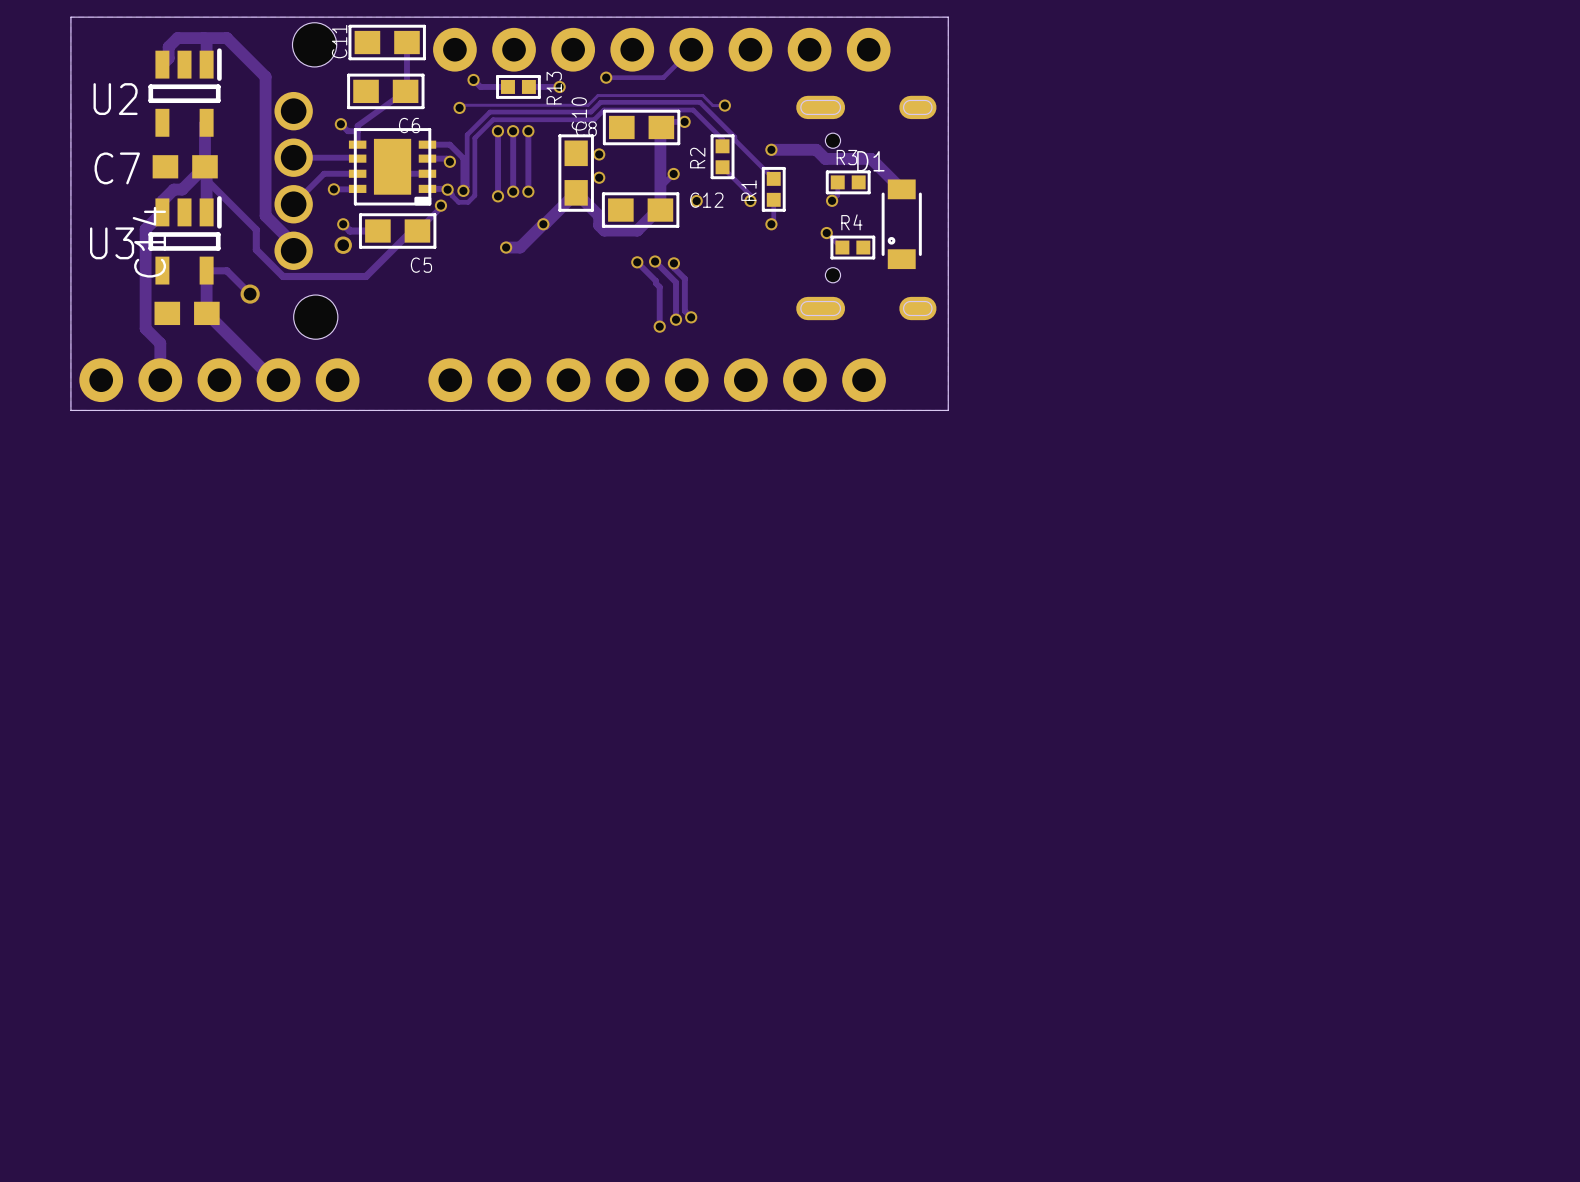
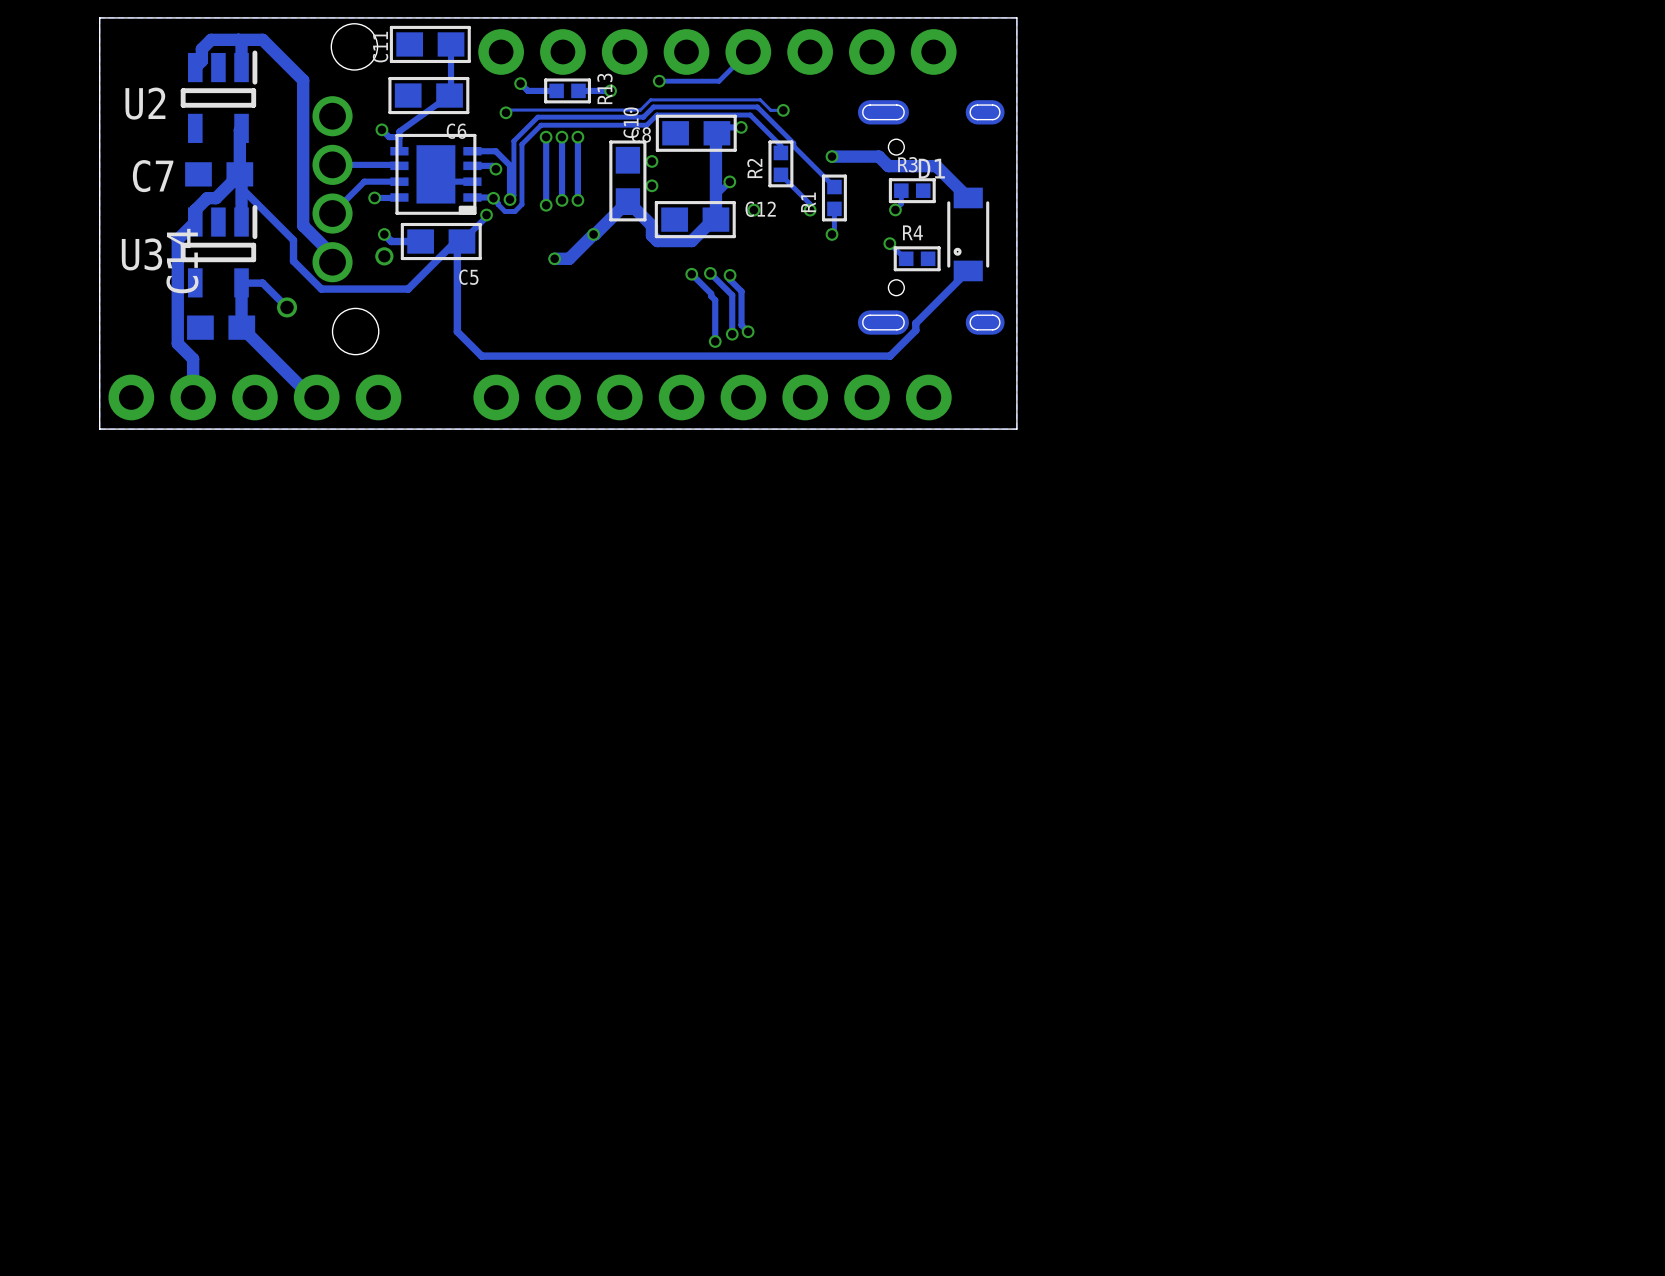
track: none -> (457, 241) (457, 331) (481, 356) (890, 356) (915, 330) (915, 323) (968, 270)

